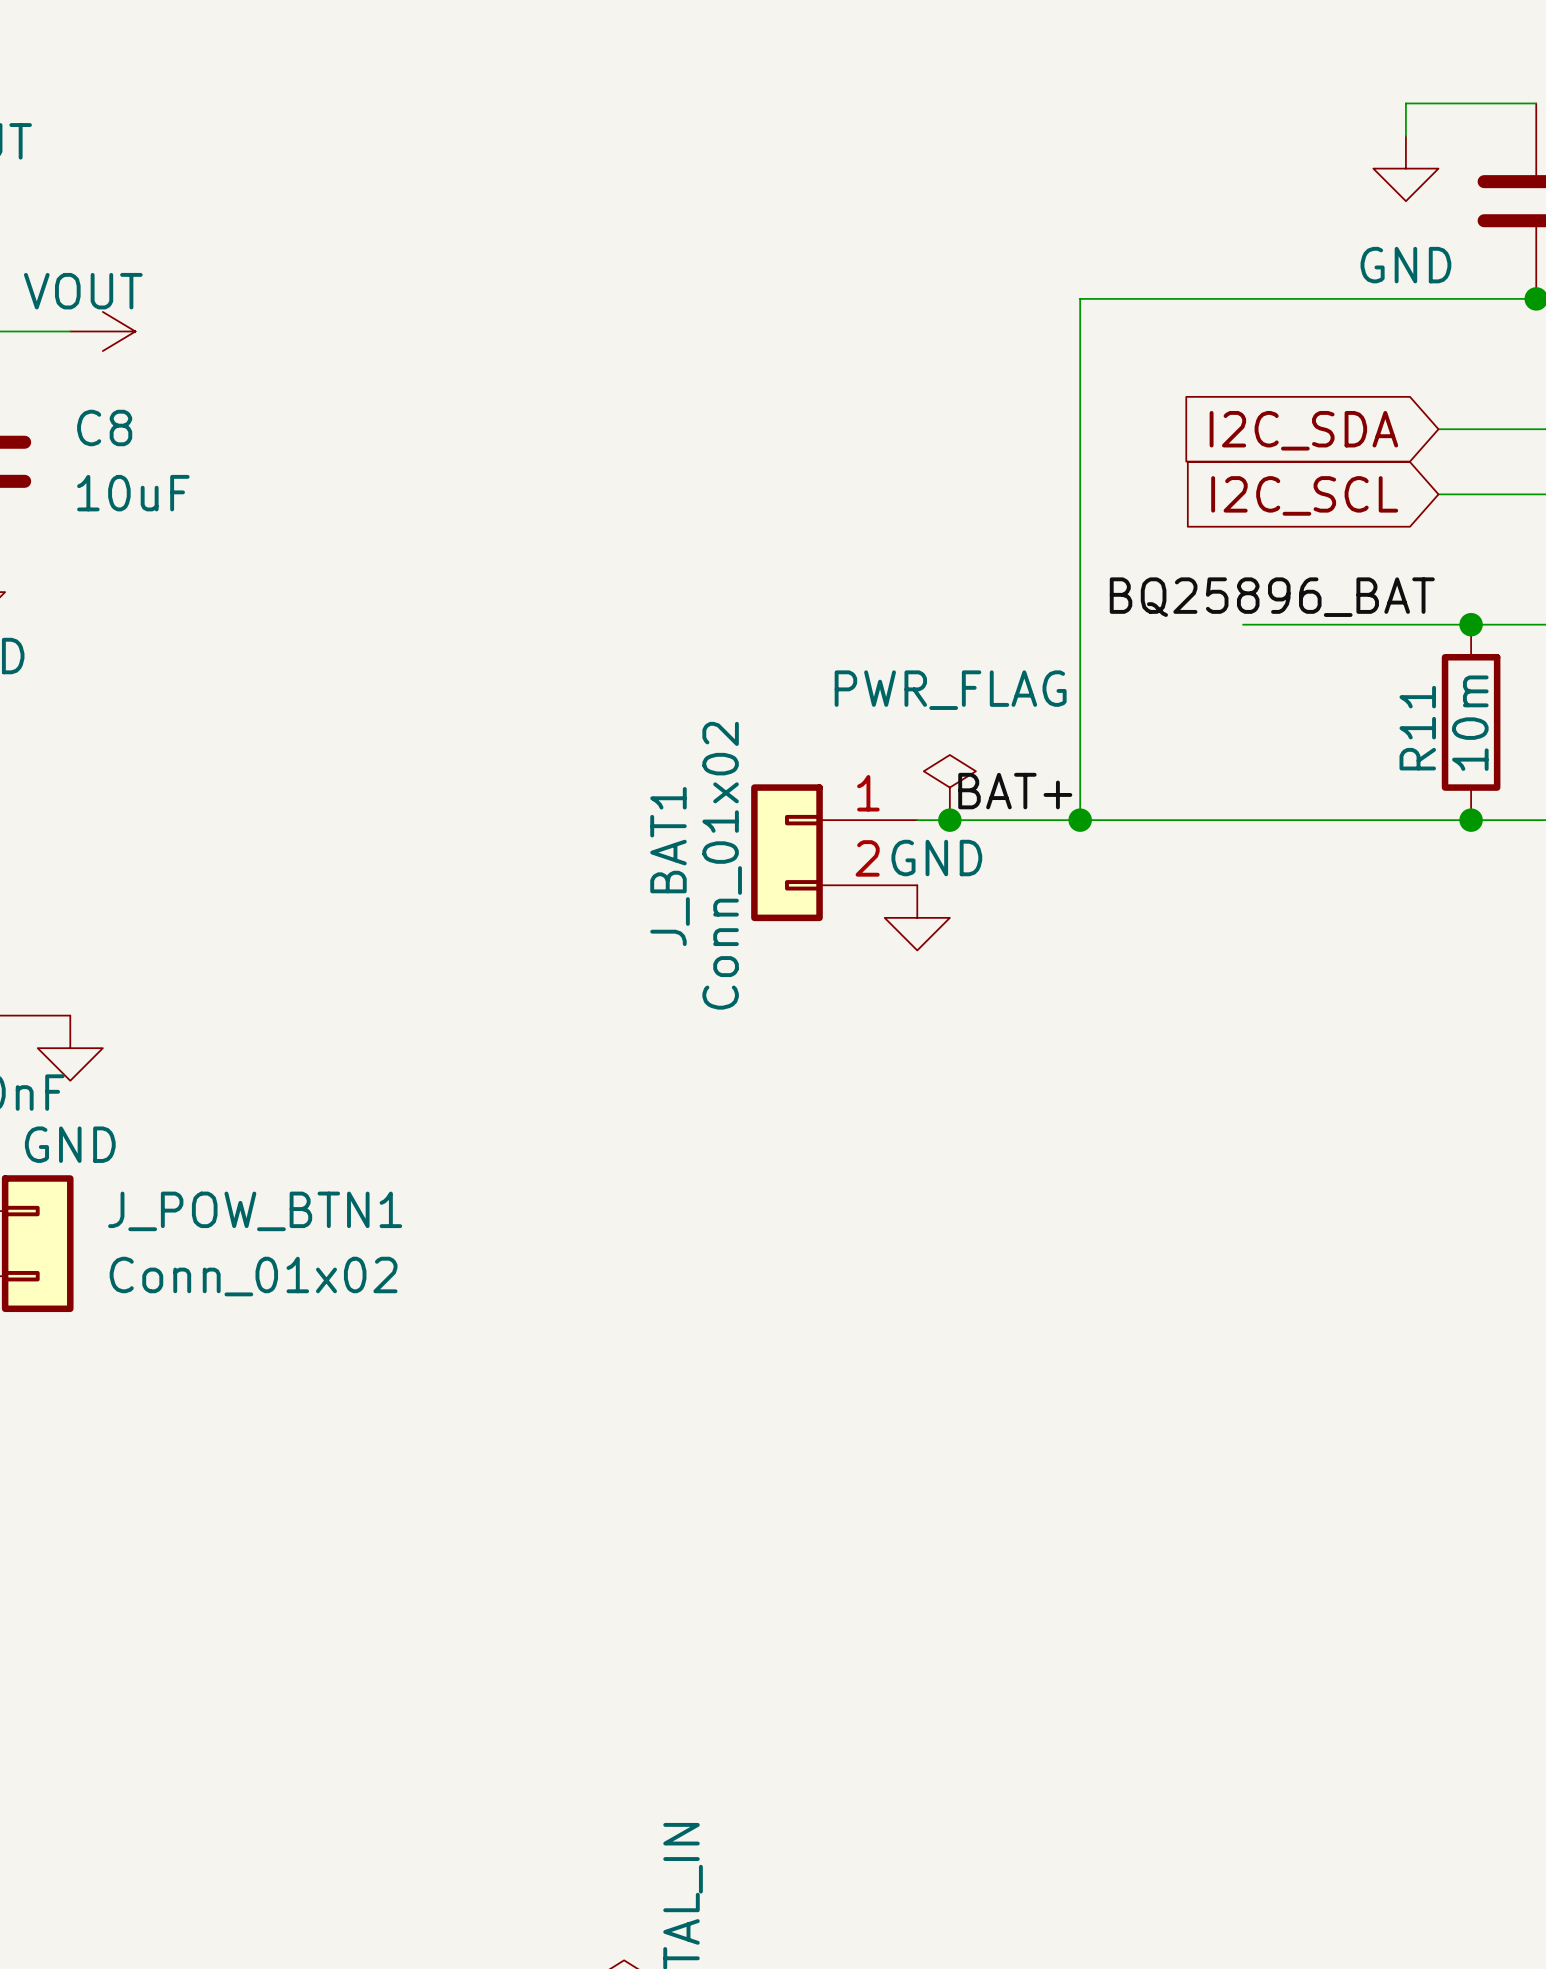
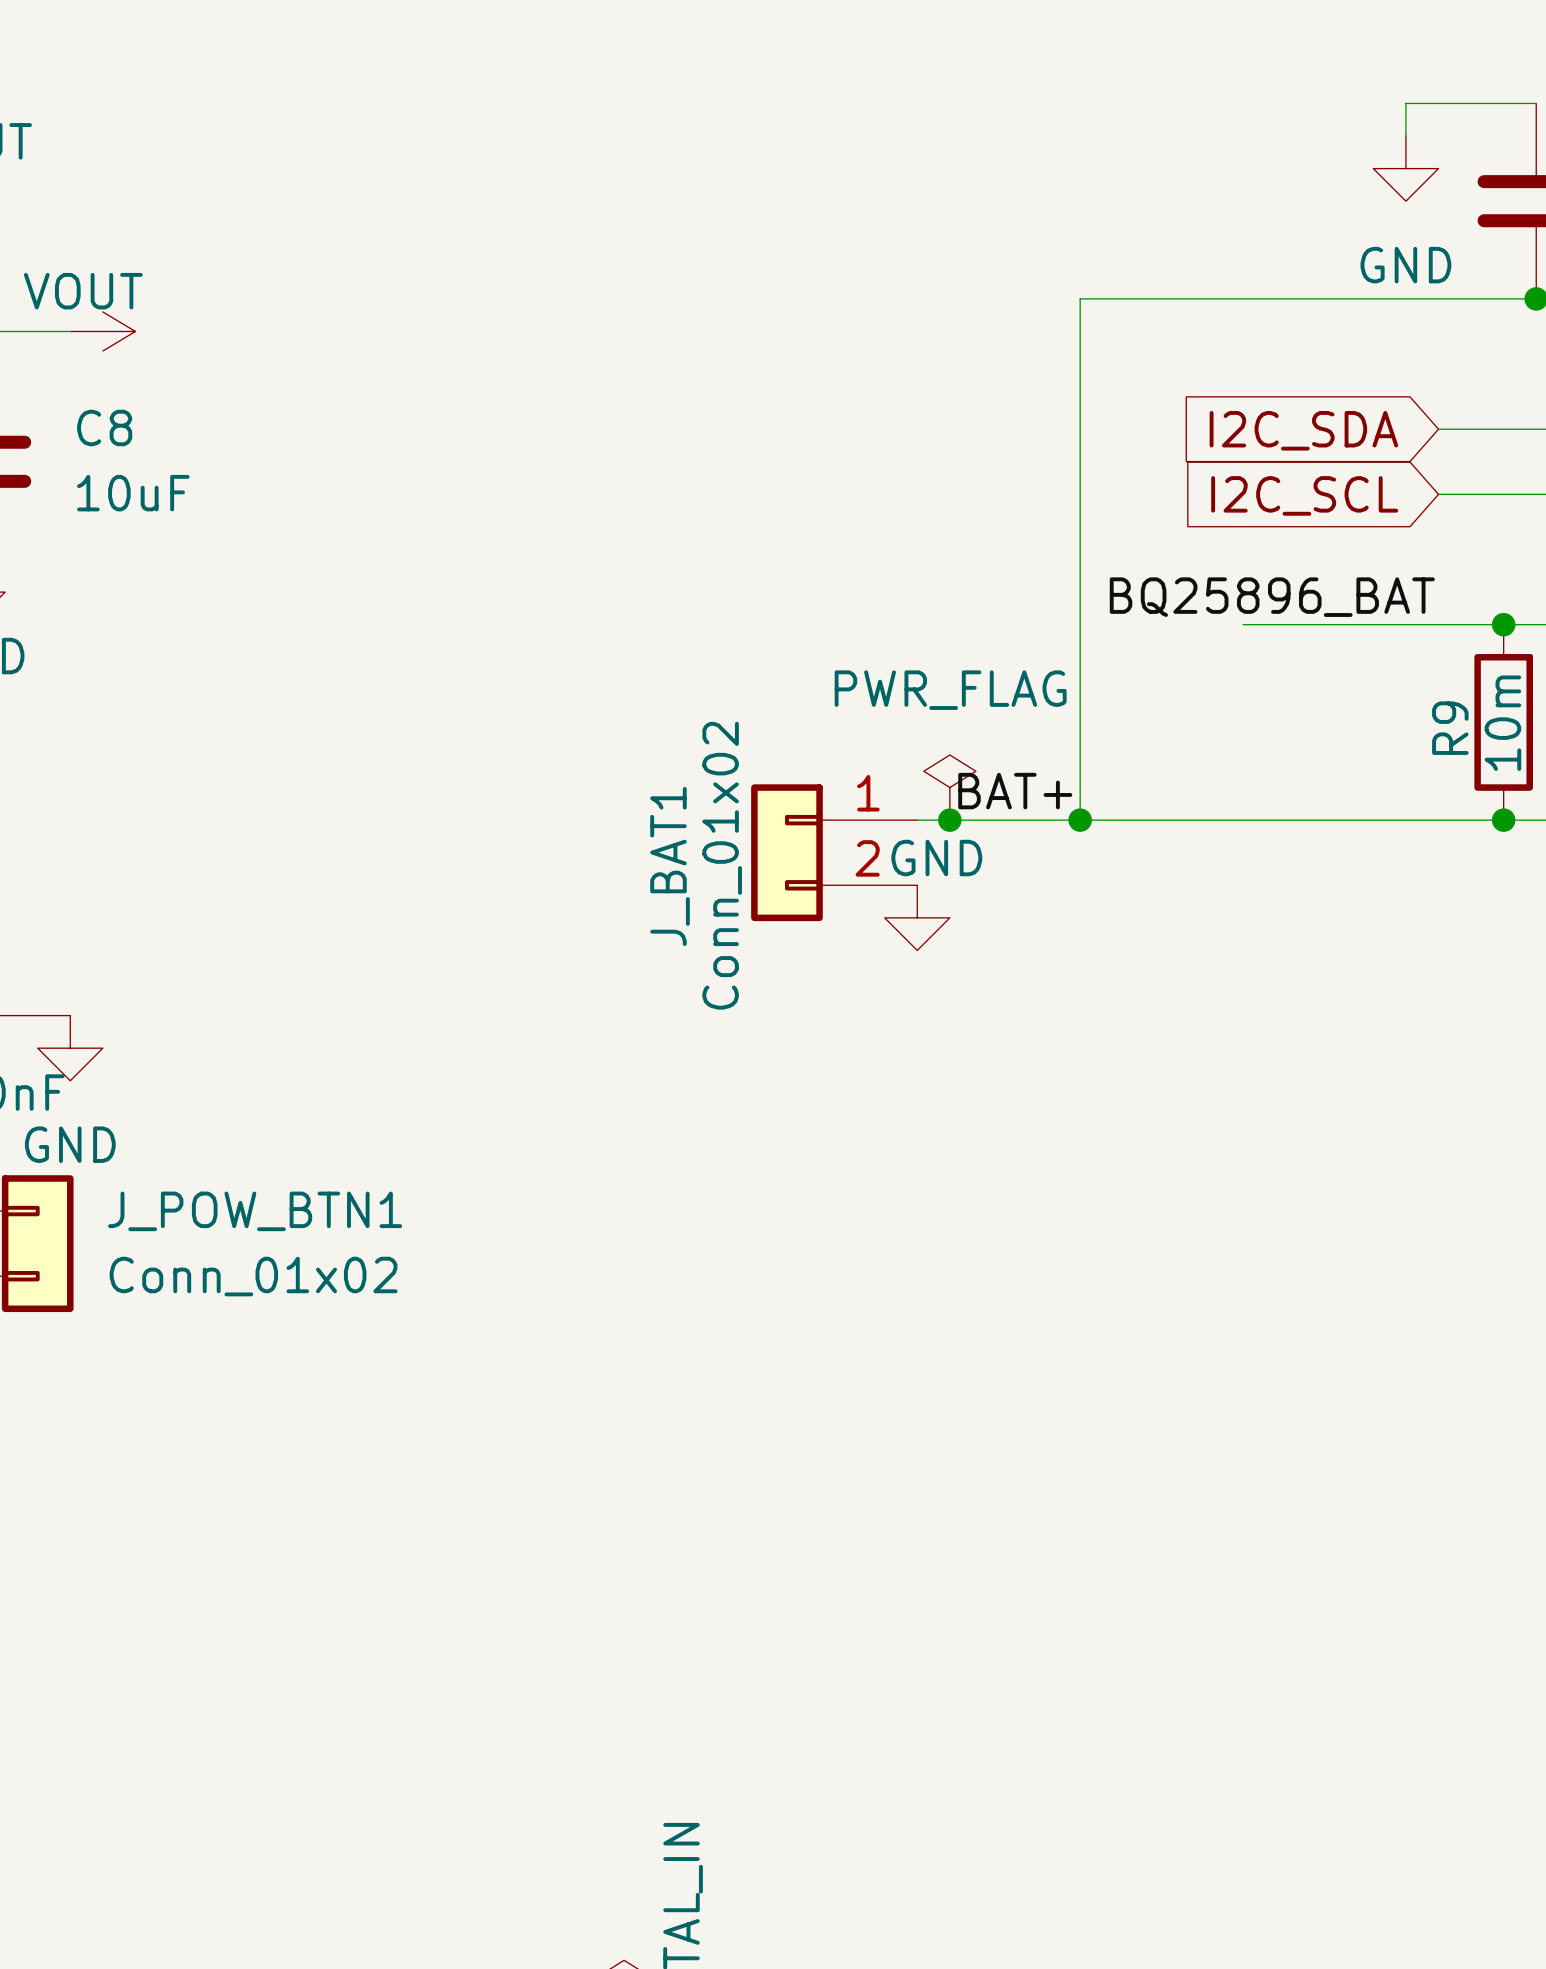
junction position: (1471, 624) -> (1503, 624)
R11: 10m (1471, 722) -> none
R9: none -> 10m (1503, 722)
junction position: (1471, 820) -> (1503, 820)

